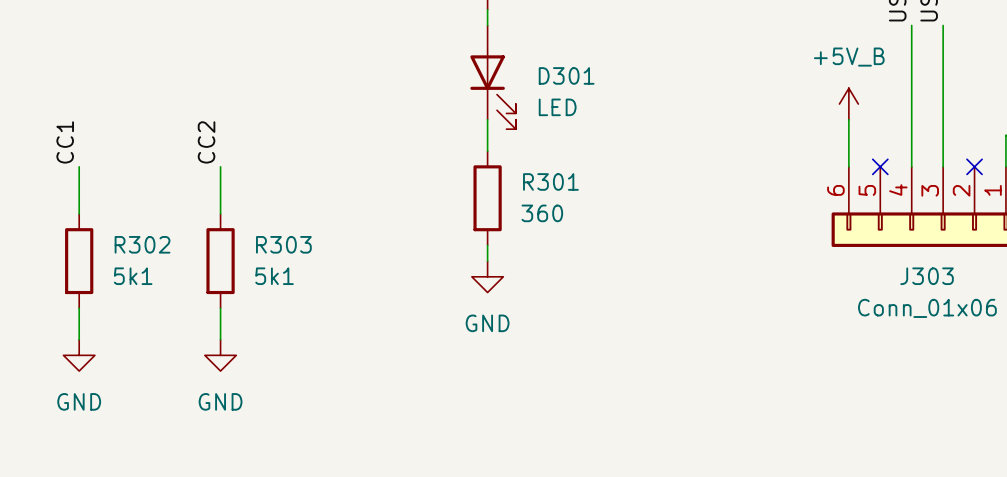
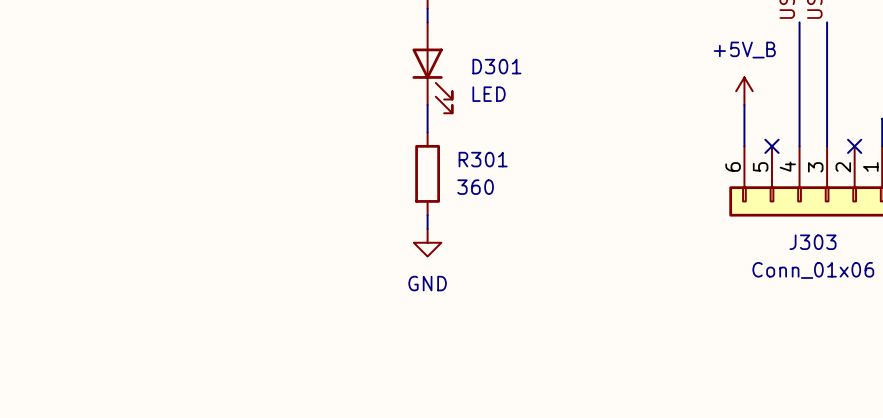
label: CC1 (65, 142) -> none
label: CC2 (206, 142) -> none
wire: (79, 166) (79, 213) -> none
wire: (220, 166) (220, 213) -> none
R302: 5k1 (79, 261) -> none
R303: 5k1 (220, 261) -> none
wire: (79, 308) (79, 339) -> none
wire: (220, 308) (220, 339) -> none
power symbol: GND (79, 355) -> none
power symbol: GND (220, 355) -> none

